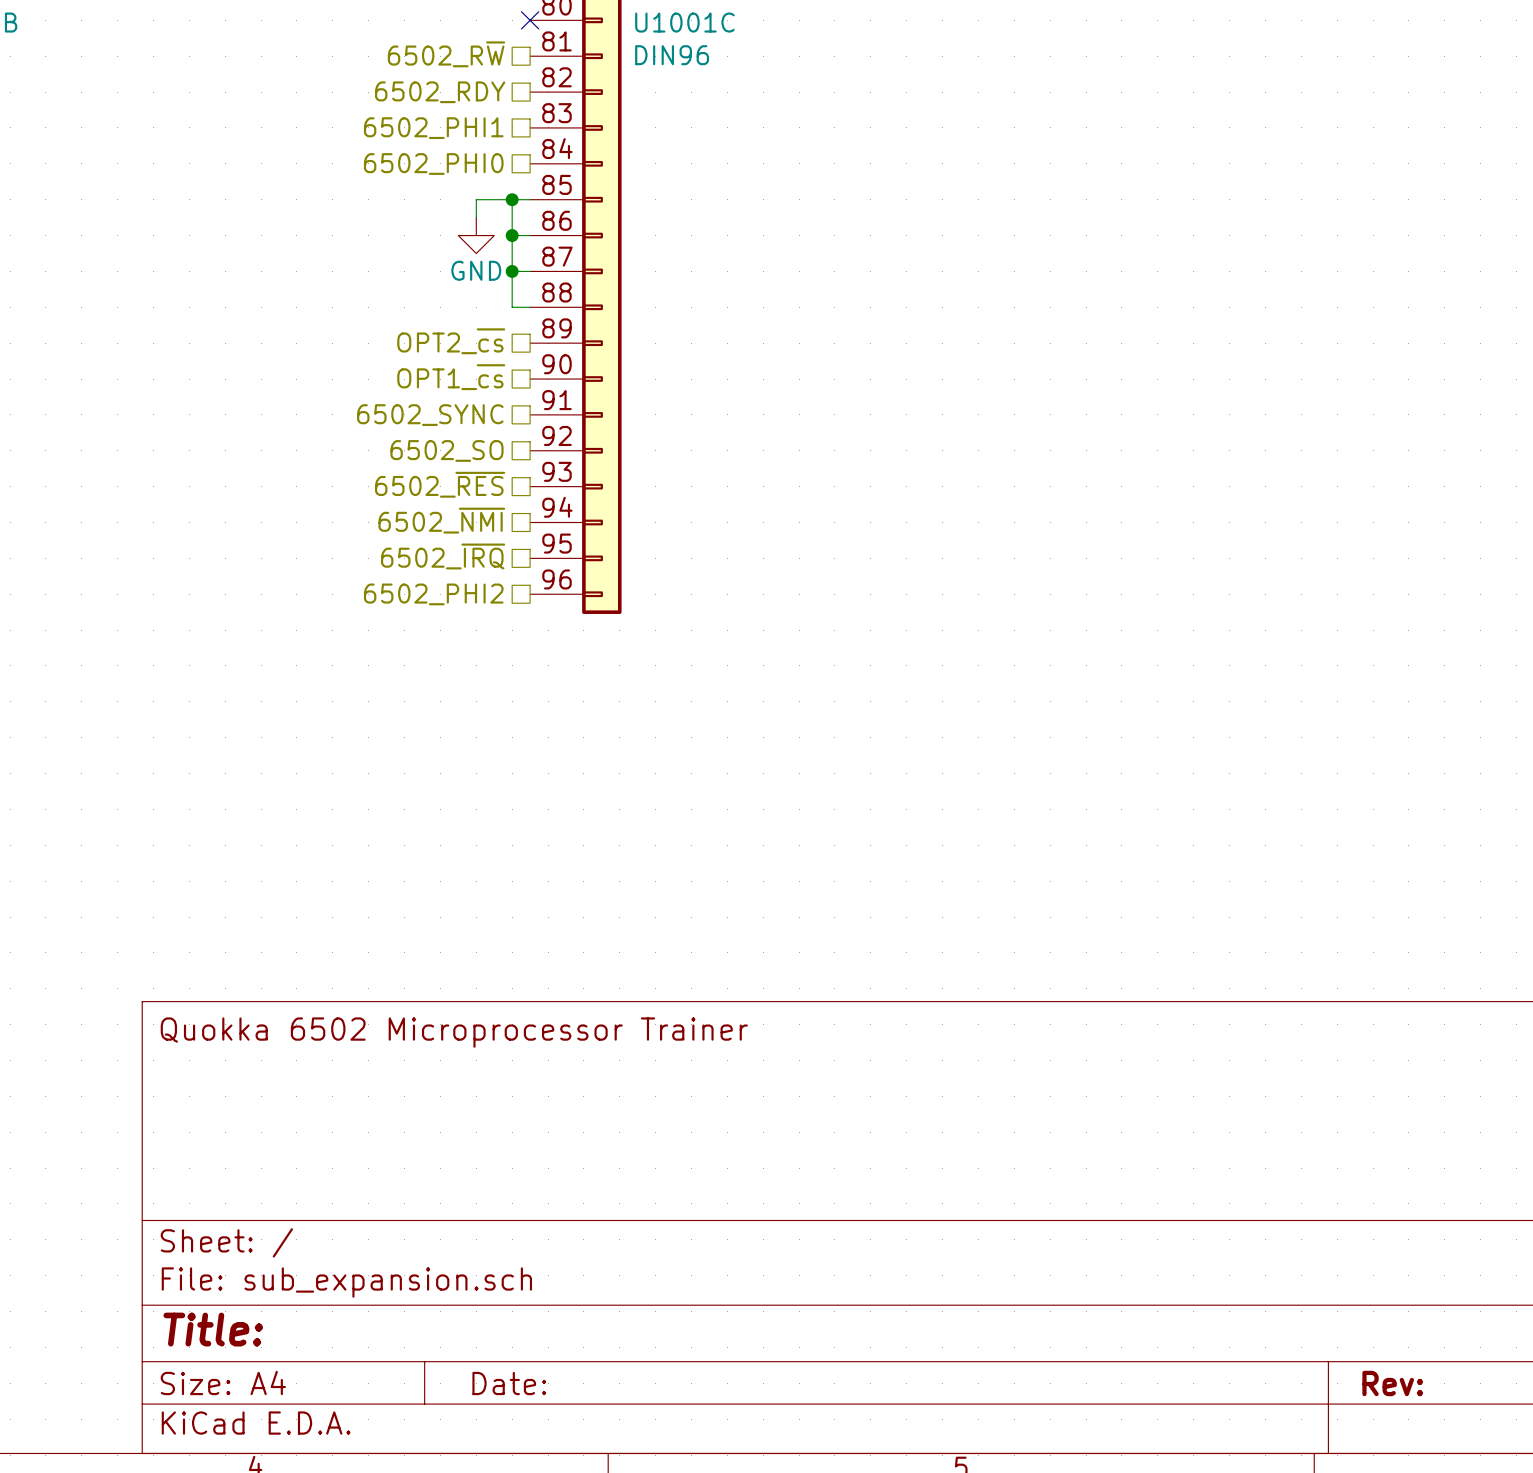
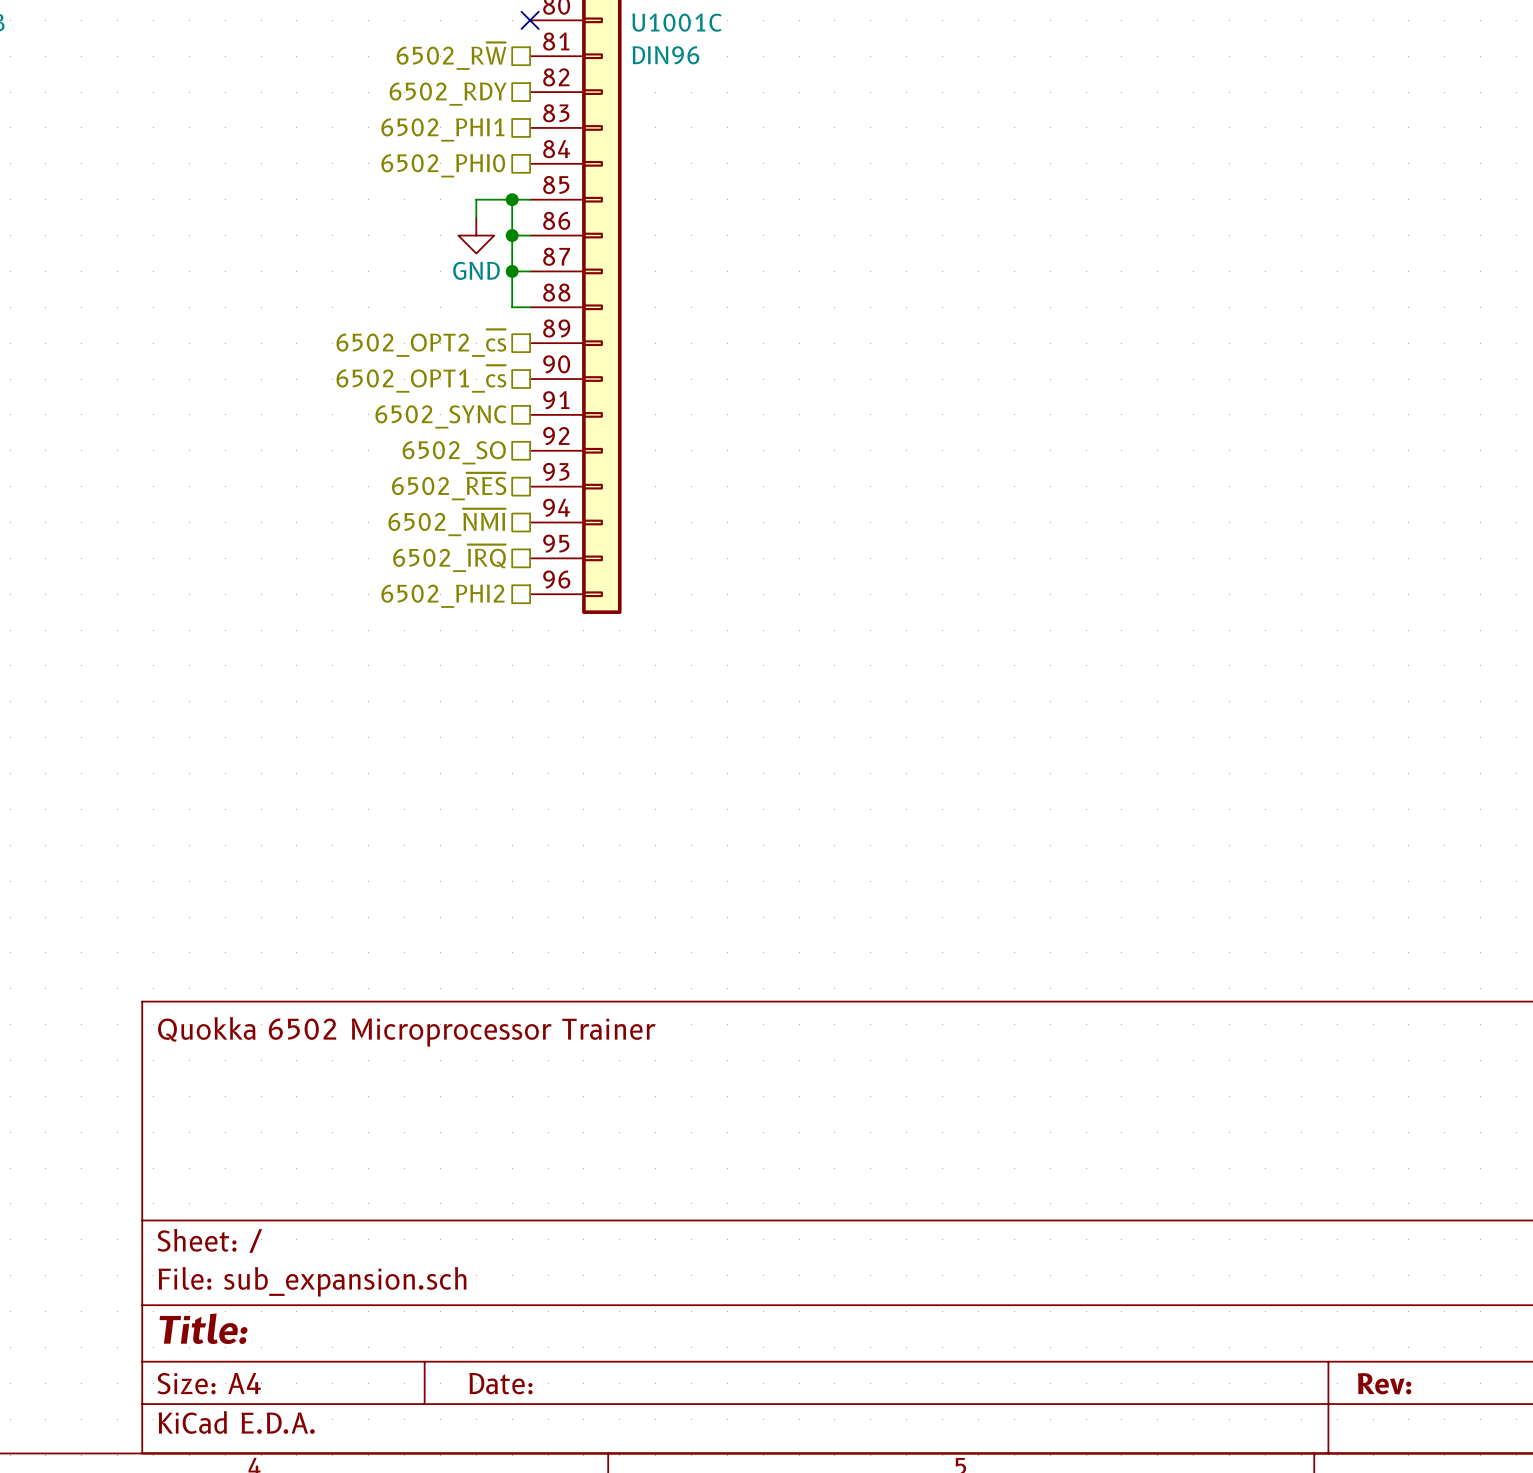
hierarchical label: OPT2_~{cs} (451, 341) -> 6502_OPT2_~{cs} (421, 343)
hierarchical label: OPT1_~{cs} (451, 377) -> 6502_OPT1_~{cs} (421, 378)

